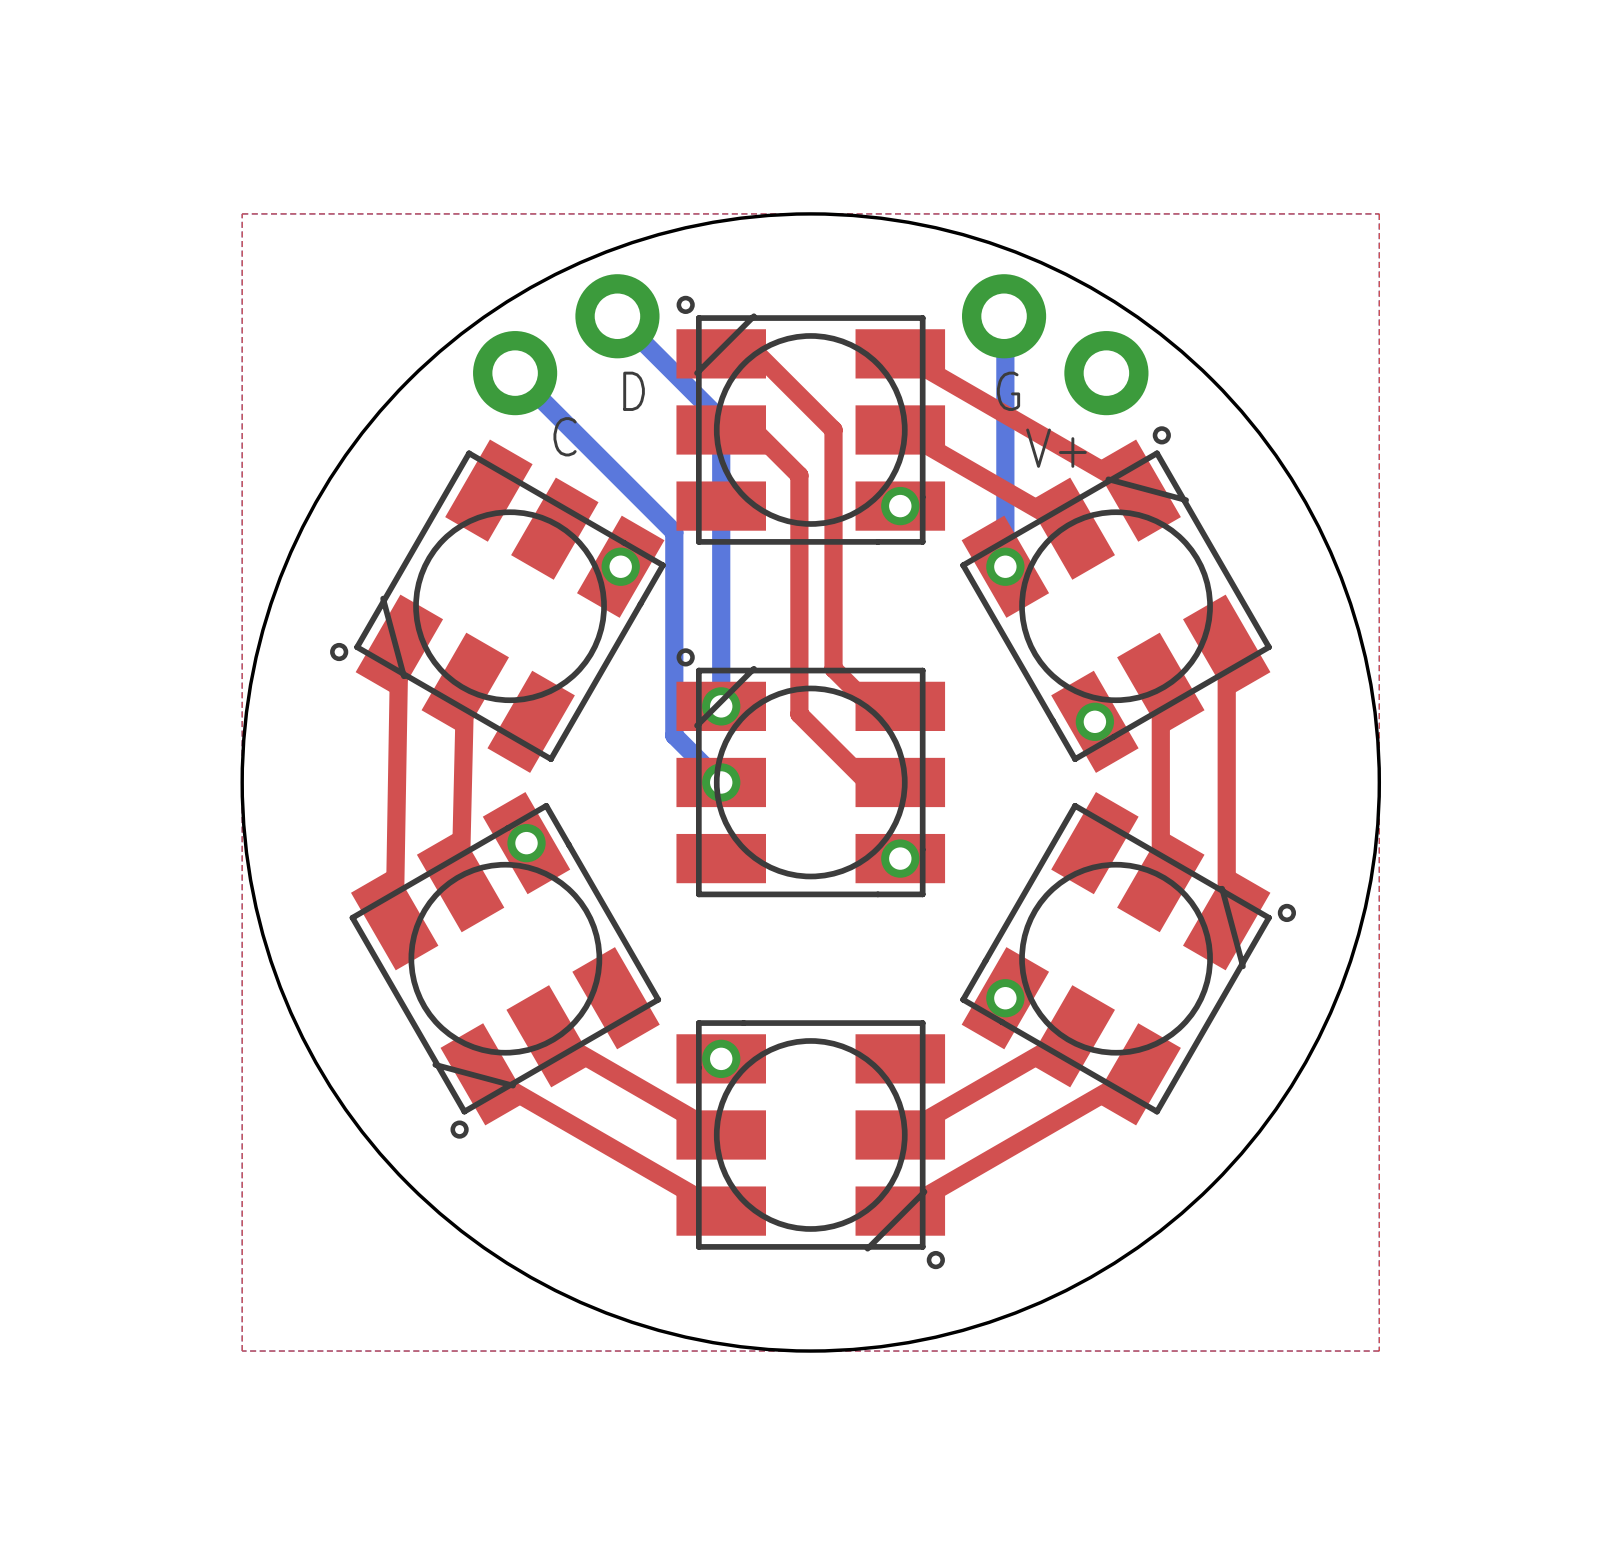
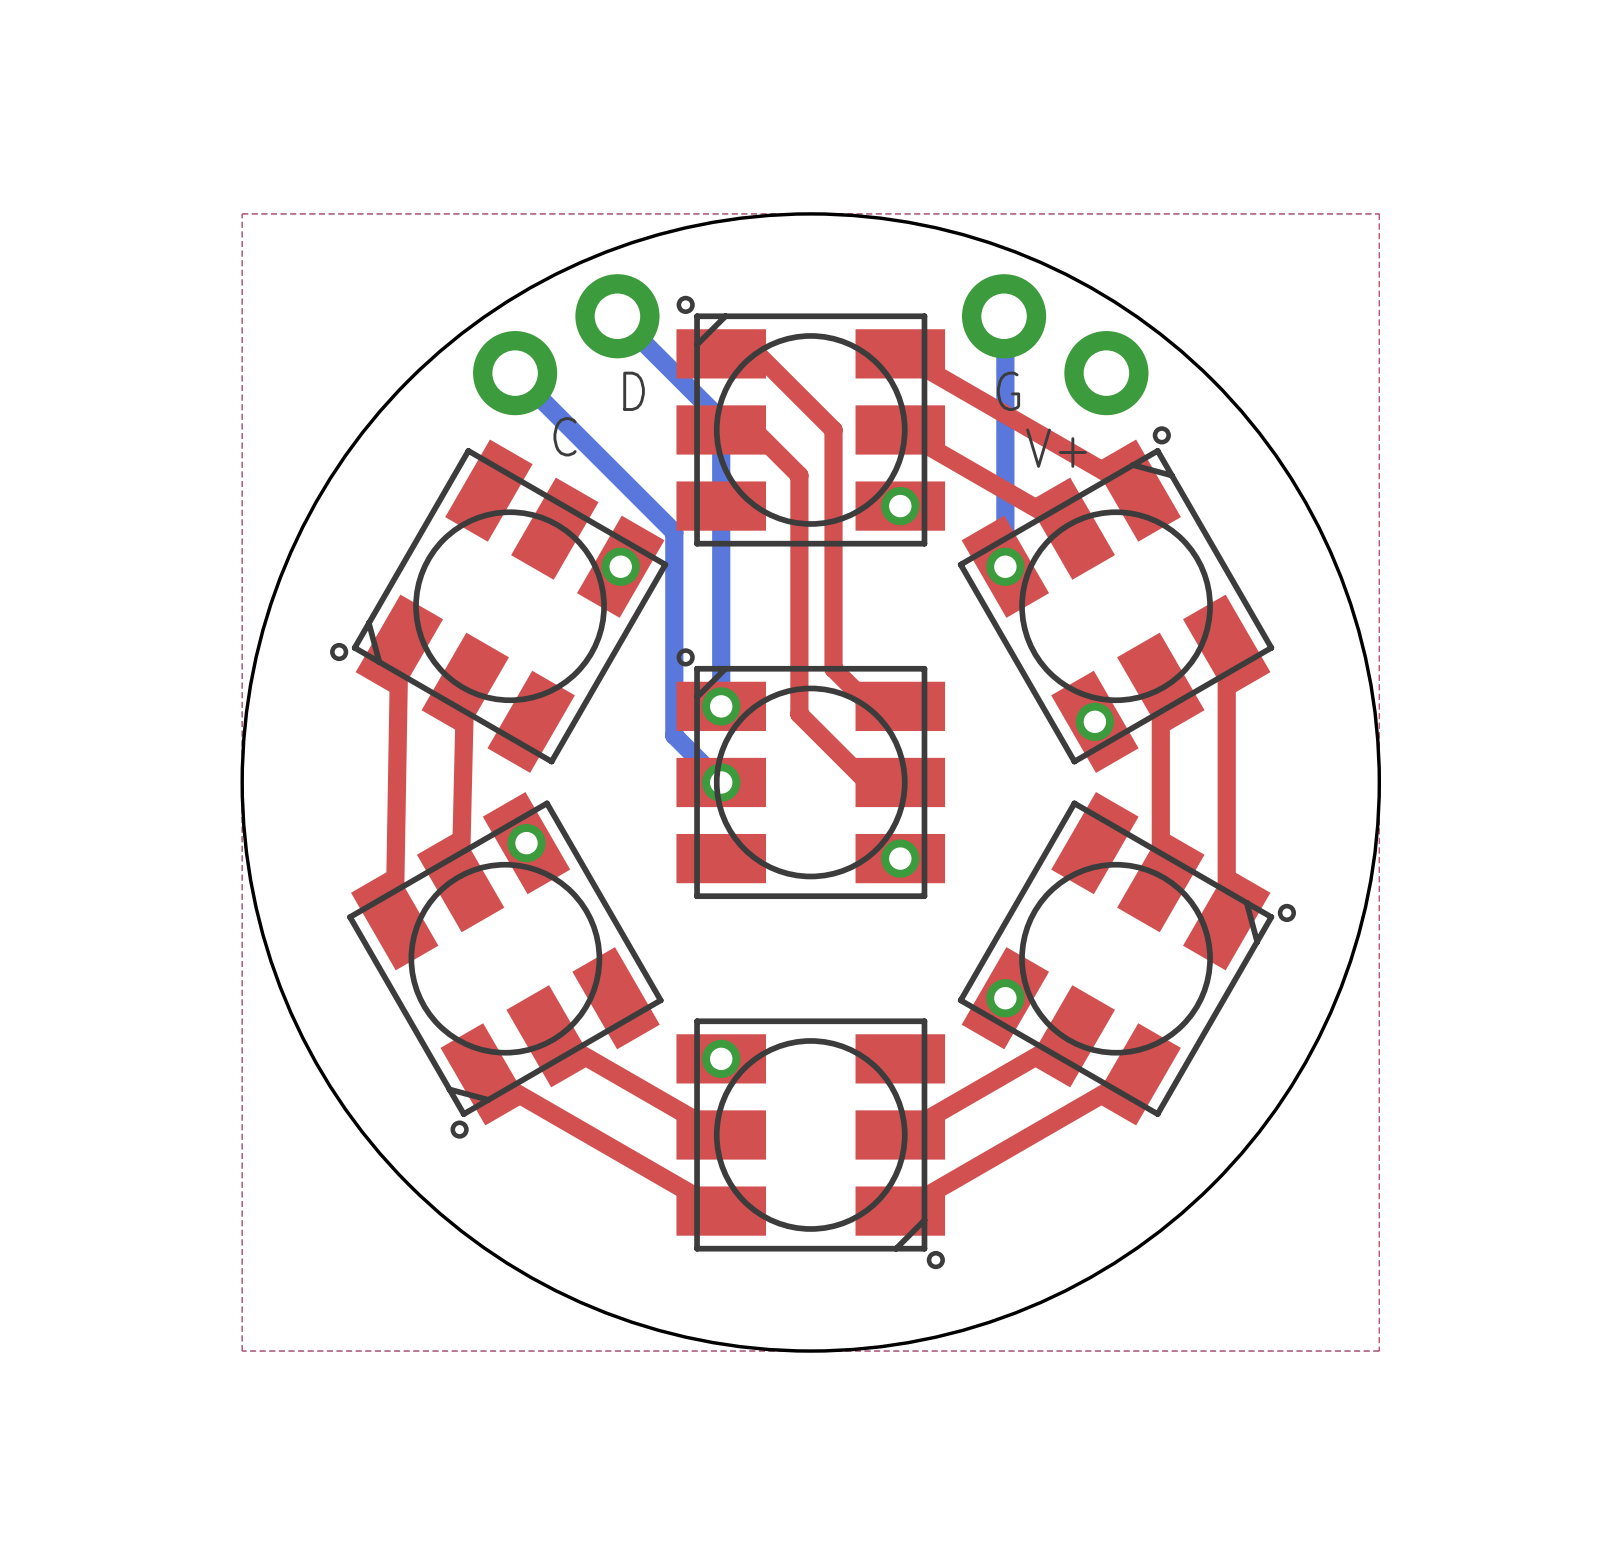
part footprint: [676, 295, 946, 545] -> [676, 295, 946, 547]
part footprint: [960, 426, 1272, 773] -> [957, 426, 1275, 773]
part footprint: [330, 439, 666, 773] -> [330, 439, 669, 773]
part footprint: [676, 648, 946, 898] -> [676, 648, 946, 900]
part footprint: [349, 792, 662, 1139] -> [347, 792, 664, 1139]
part footprint: [960, 792, 1297, 1126] -> [957, 792, 1297, 1126]
part footprint: [676, 1020, 946, 1270] -> [676, 1018, 946, 1270]

